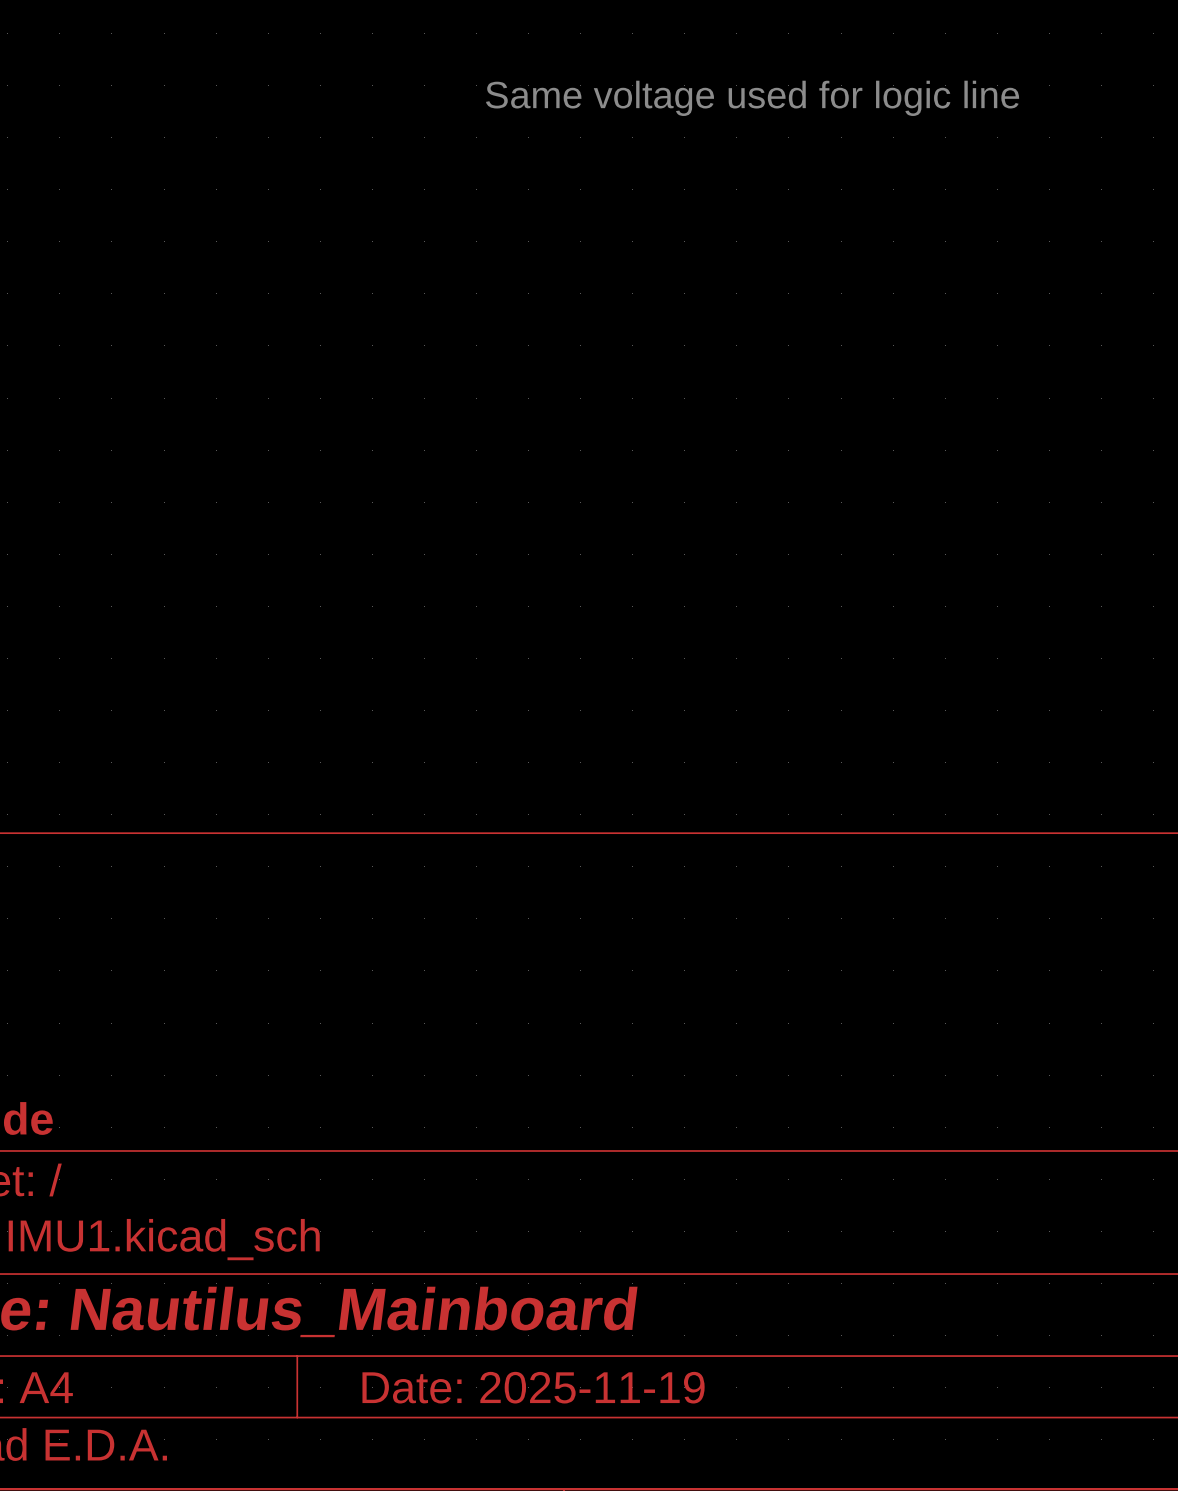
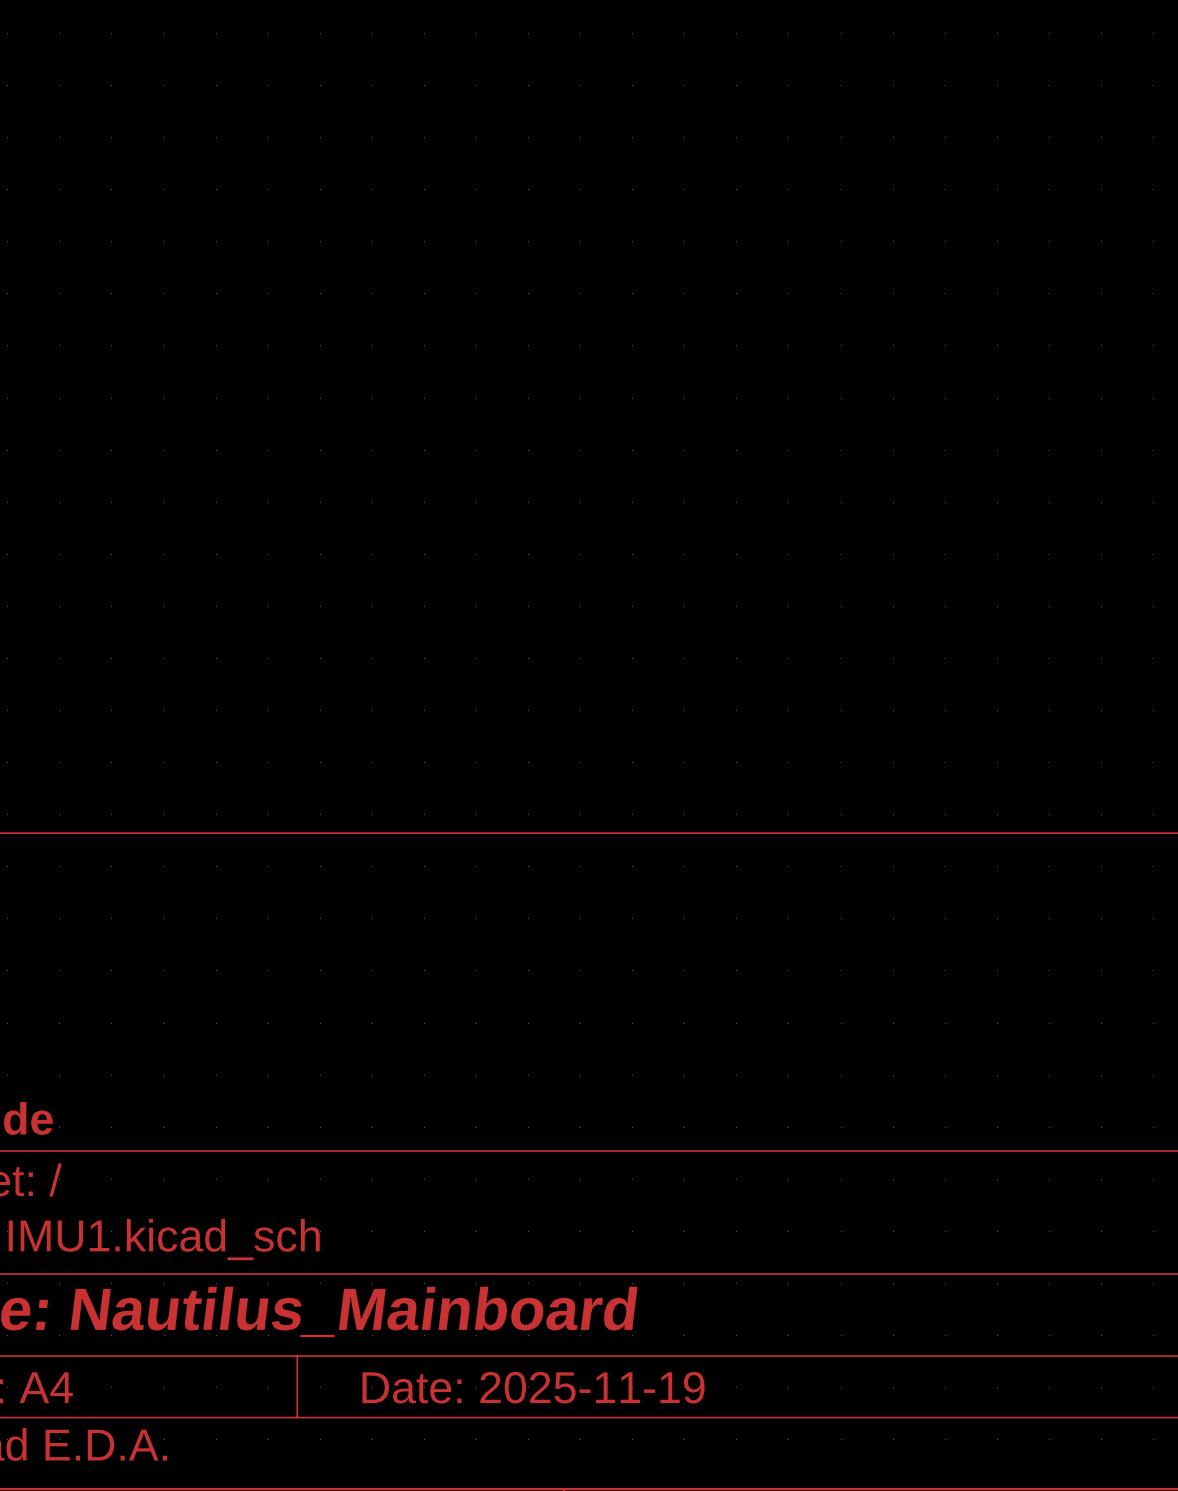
text: Same voltage used for logic line (752, 98) -> none

